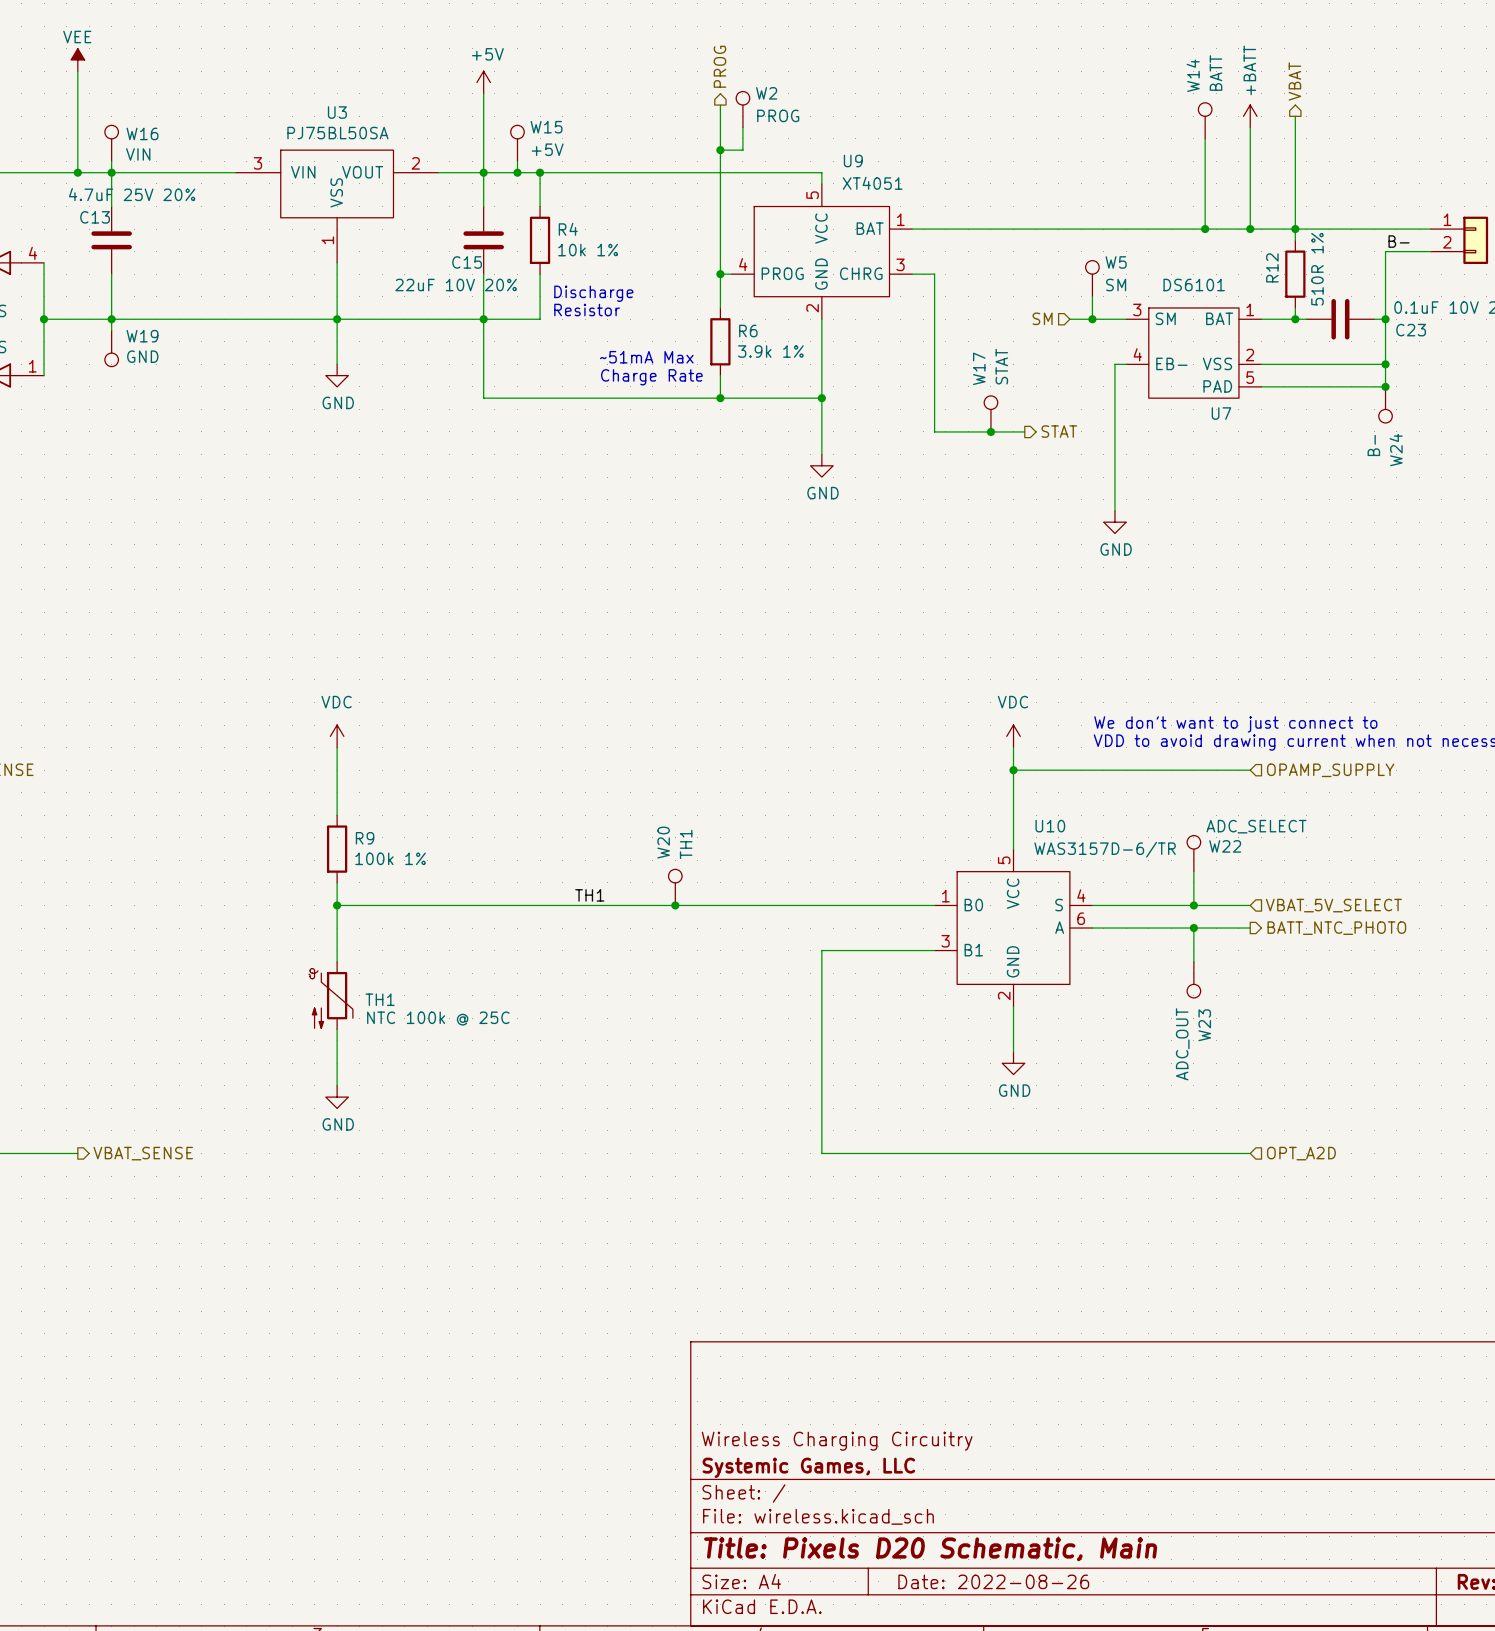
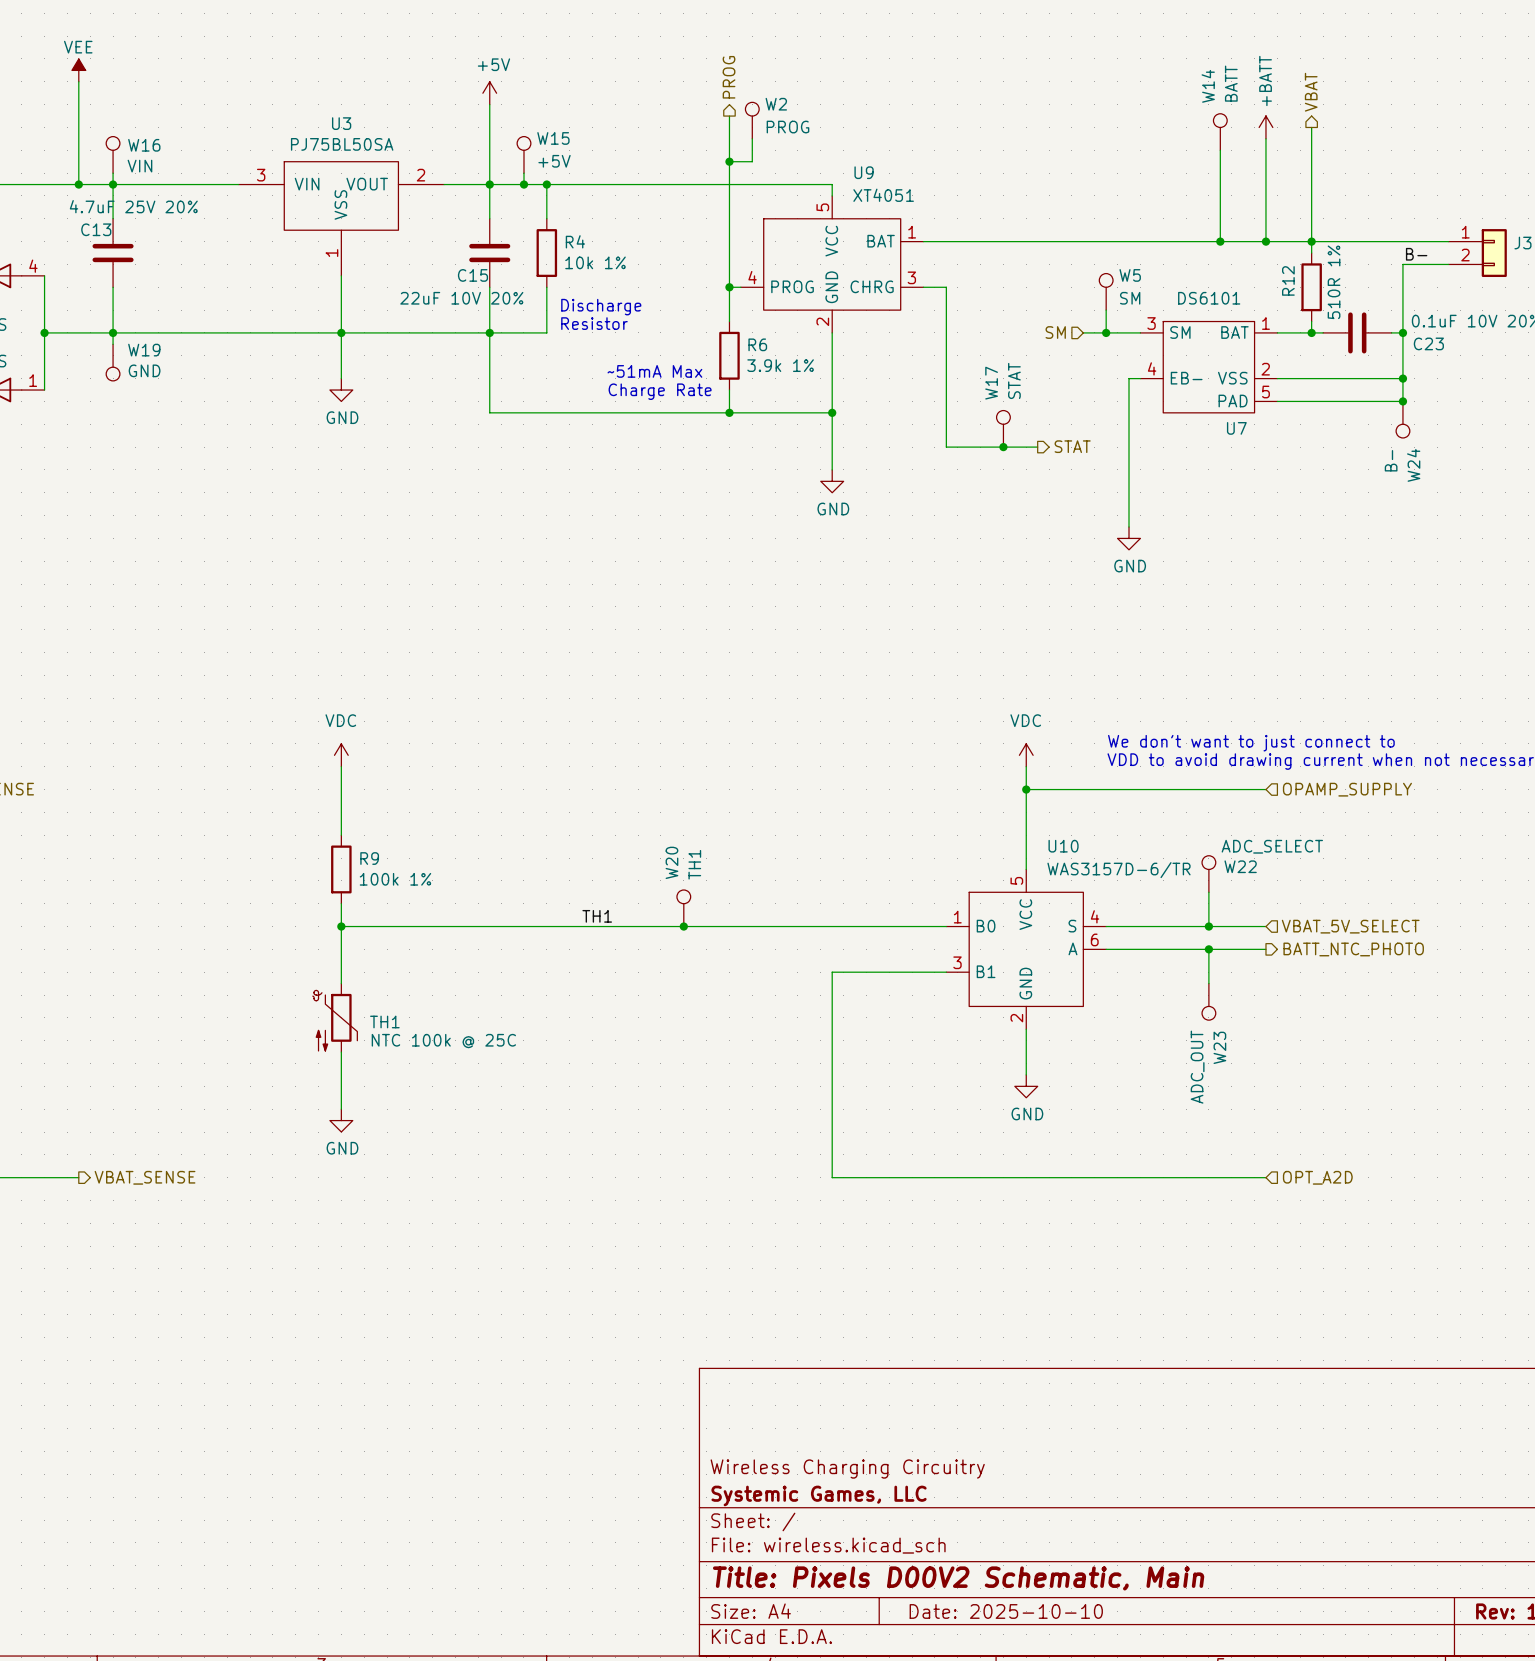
title block: Title: Pixels D20 Schematic, Main (930, 1549) -> Title: Pixels D00V2 Schematic, Main (958, 1578)
title block: Date: 2022-08-26 (993, 1581) -> Date: 2025-10-10 (1006, 1611)

